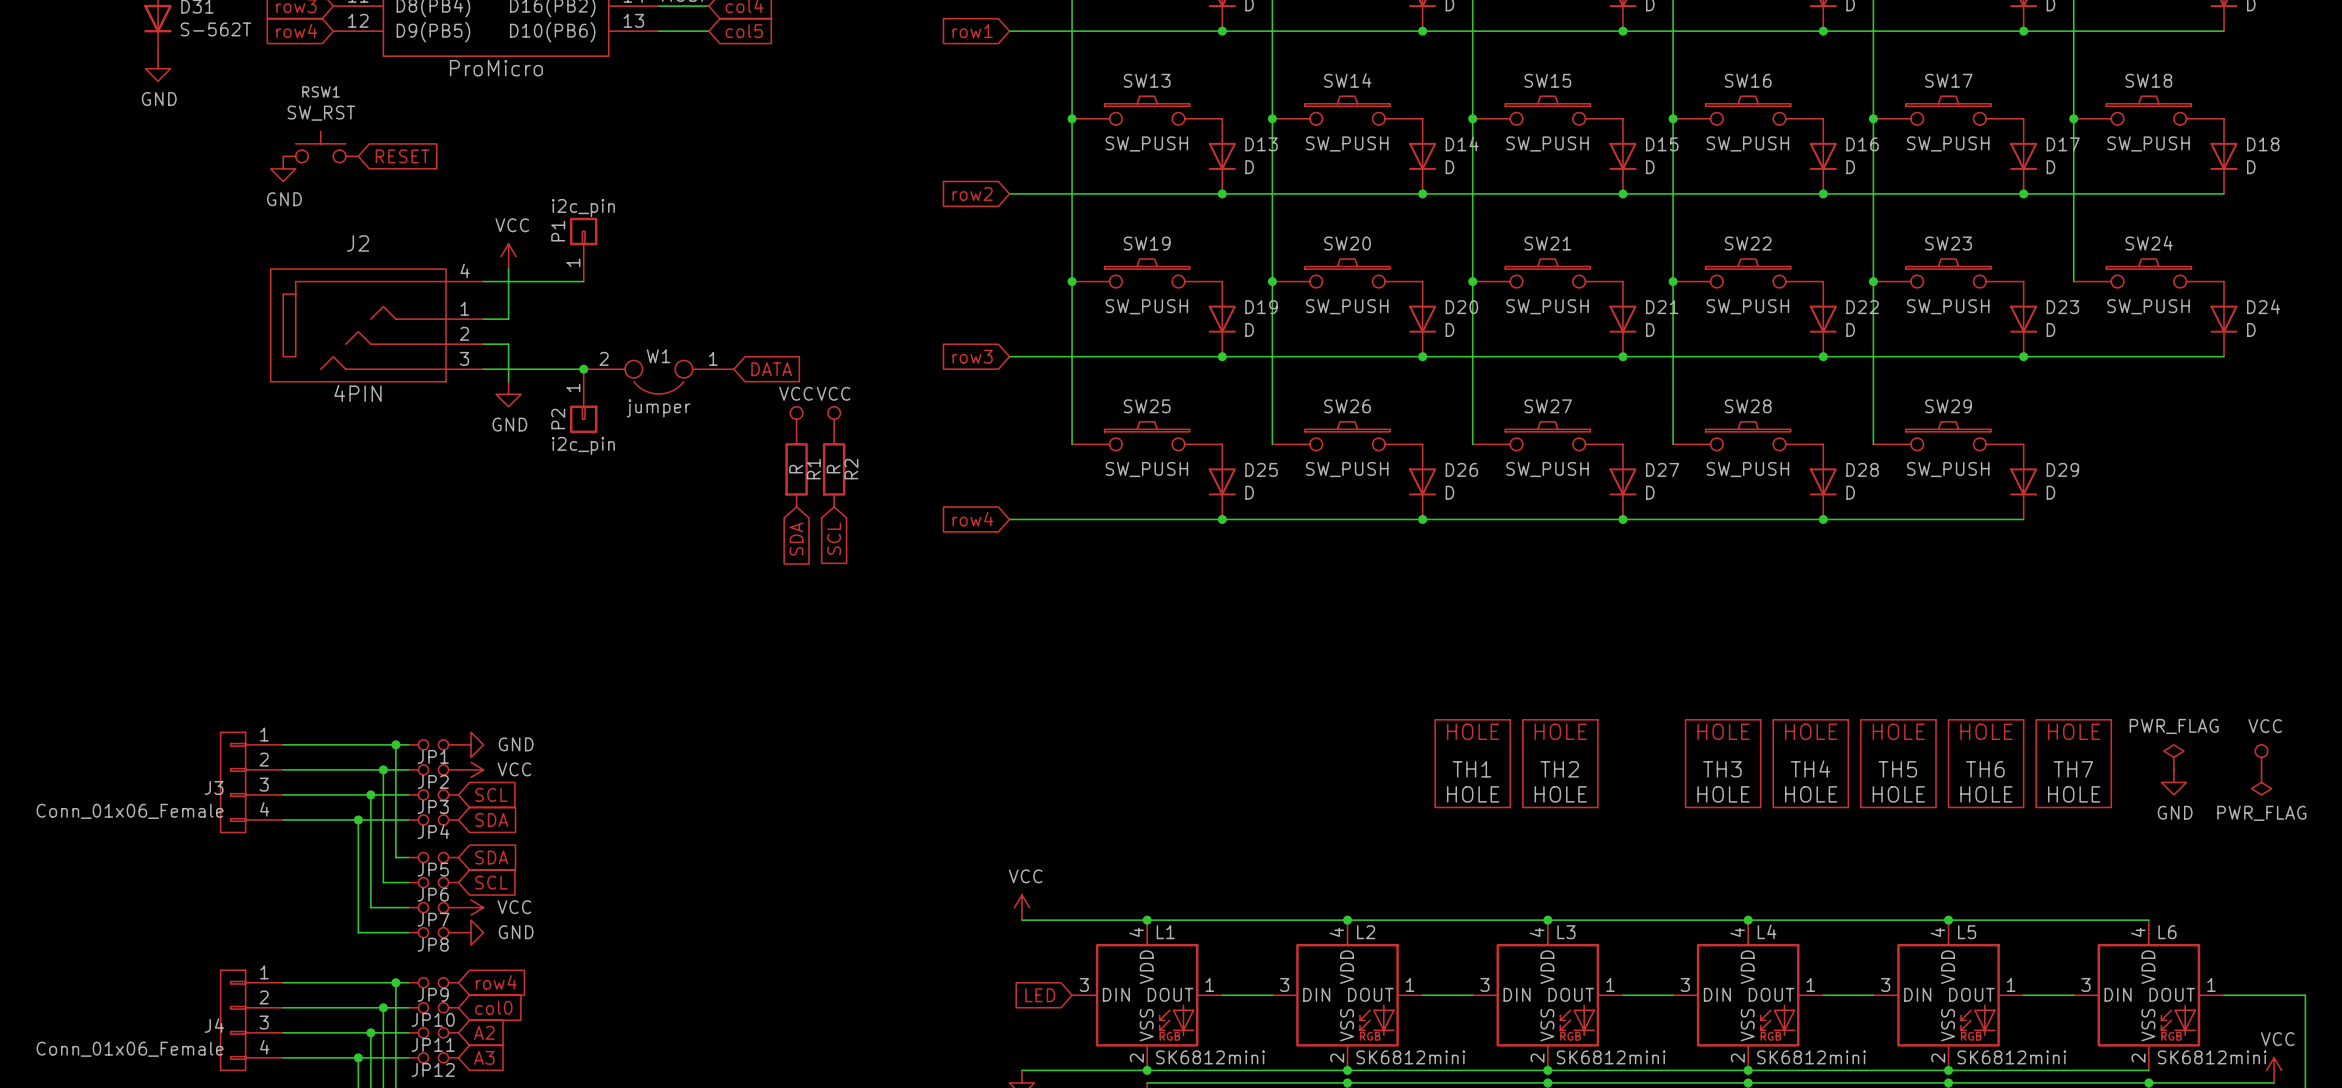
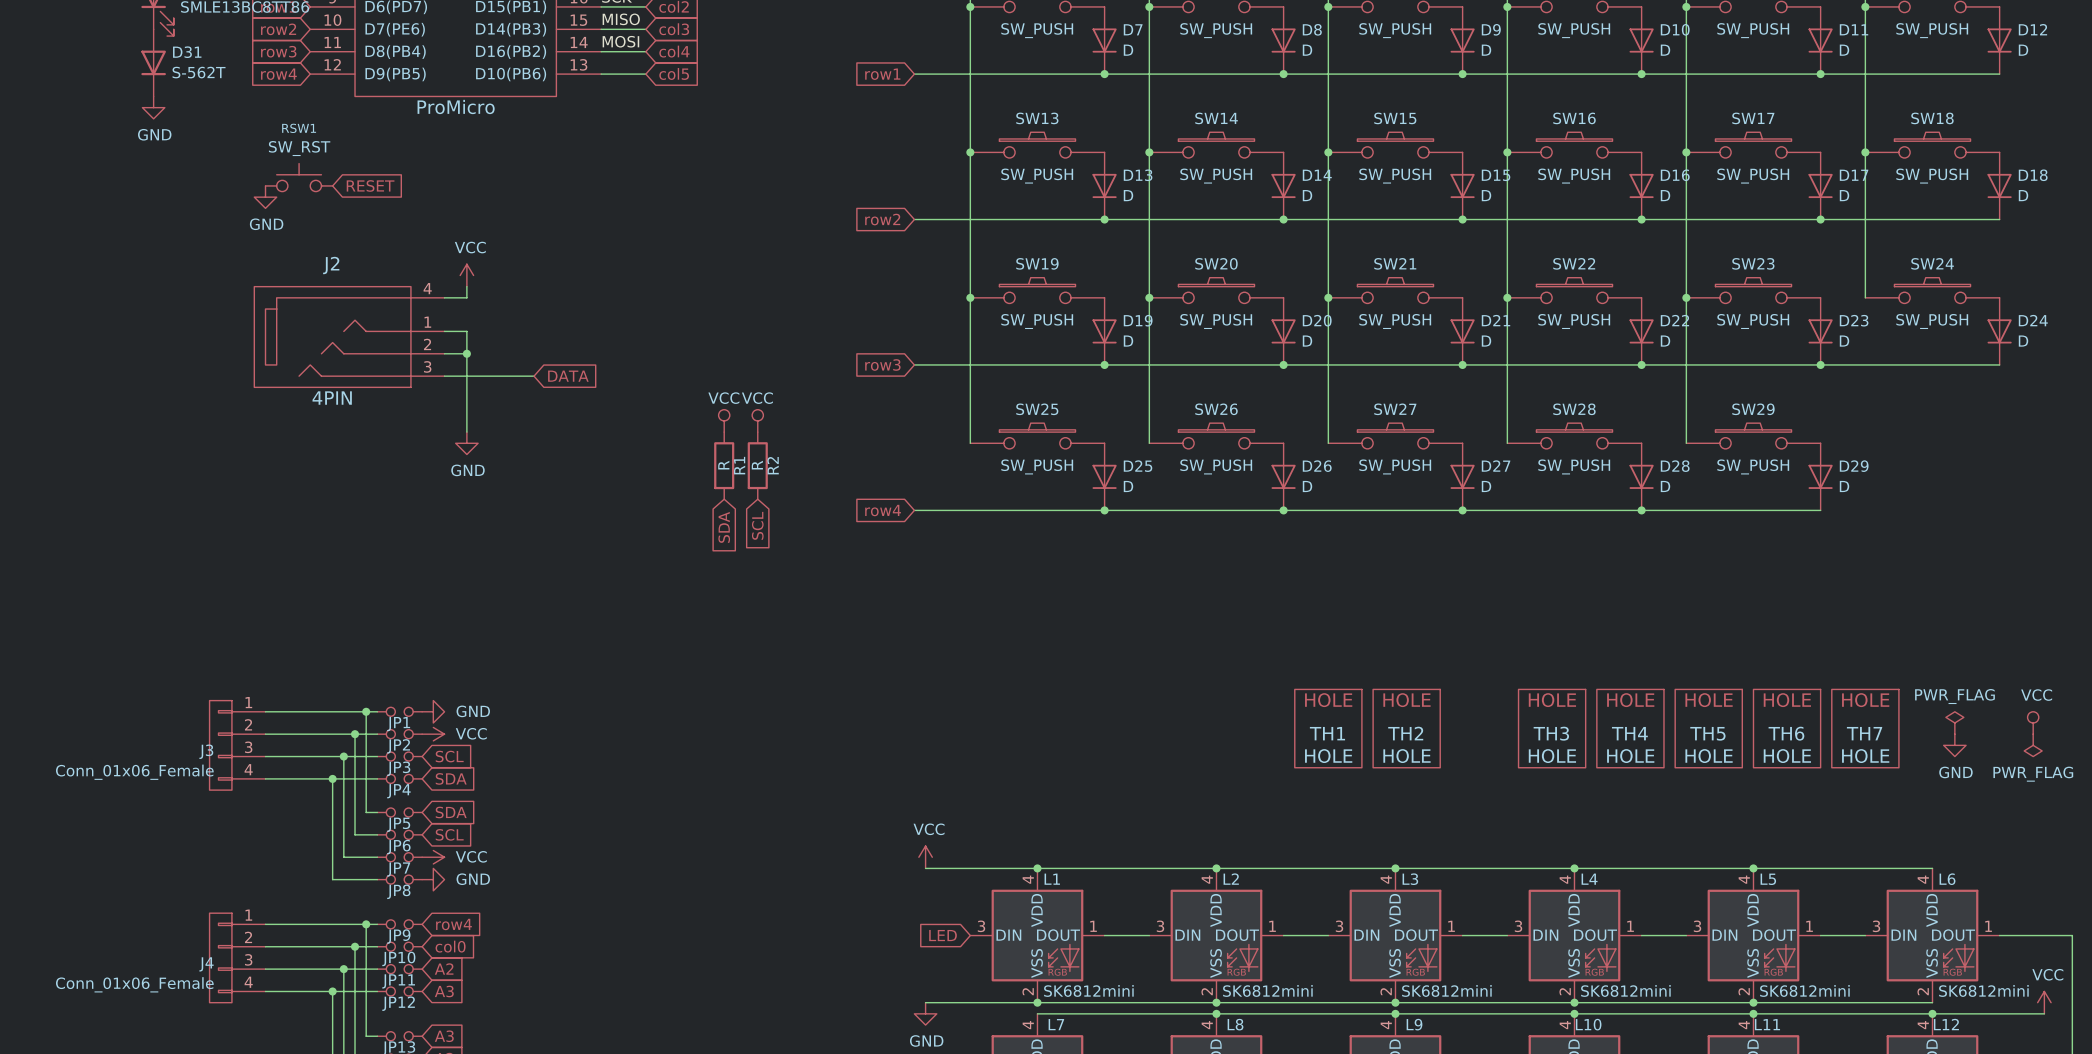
P1: i2c_pin (583, 249) -> none
wire: (583, 281) (508, 281) (508, 319) -> (466, 353) (466, 331)
junction: none -> (466, 353)
junction: (583, 369) -> none
global label position: DATA (771, 369) -> DATA (568, 376)
W1: jumper (658, 377) -> none
wire: none -> (466, 387) (466, 432)
power symbol position: GND (508, 394) -> GND (466, 443)
P2: i2c_pin (583, 401) -> none

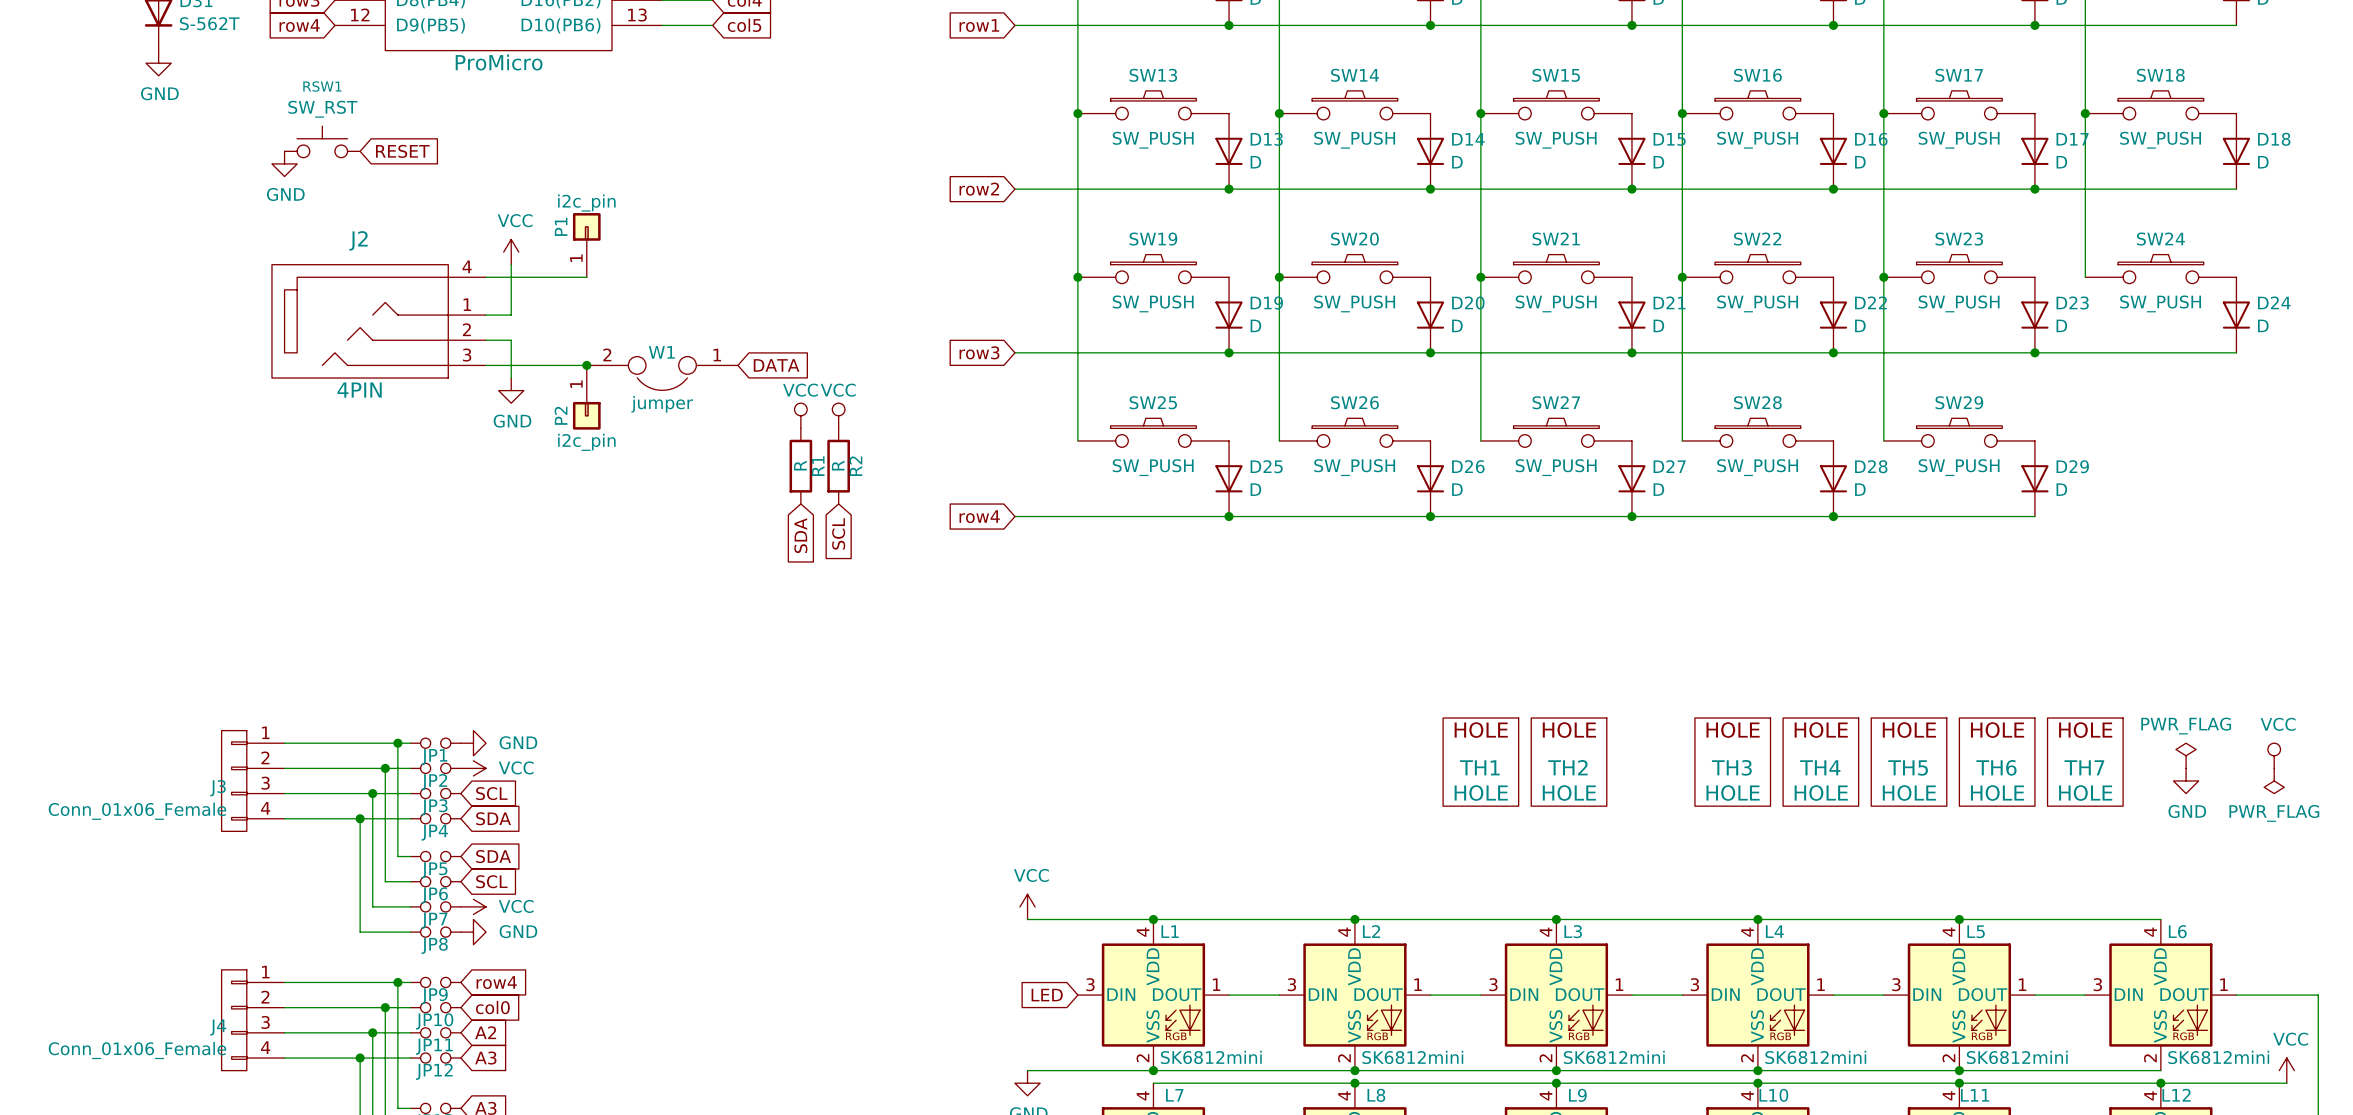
P1: none -> i2c_pin (586, 245)
wire: (466, 331) (466, 353) -> (511, 315) (511, 277) (586, 277)
junction: (466, 353) -> none
junction: none -> (586, 365)
global label position: DATA (568, 376) -> DATA (776, 365)
W1: none -> jumper (662, 373)
wire: (466, 387) (466, 432) -> none
P2: none -> i2c_pin (586, 397)
power symbol position: GND (466, 443) -> GND (511, 390)

